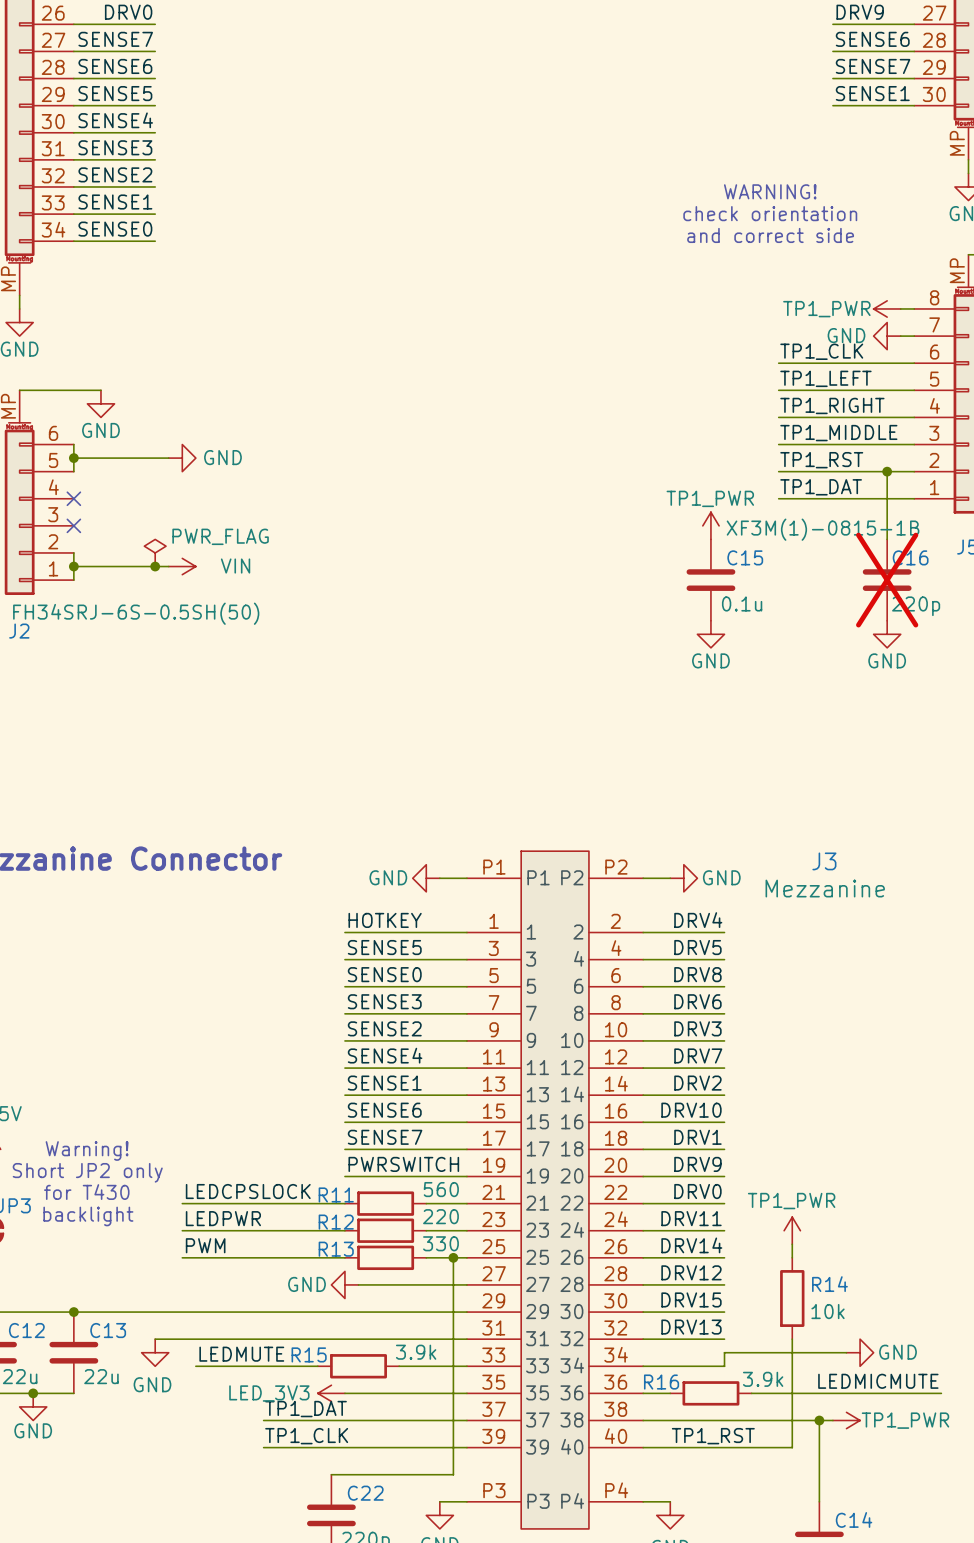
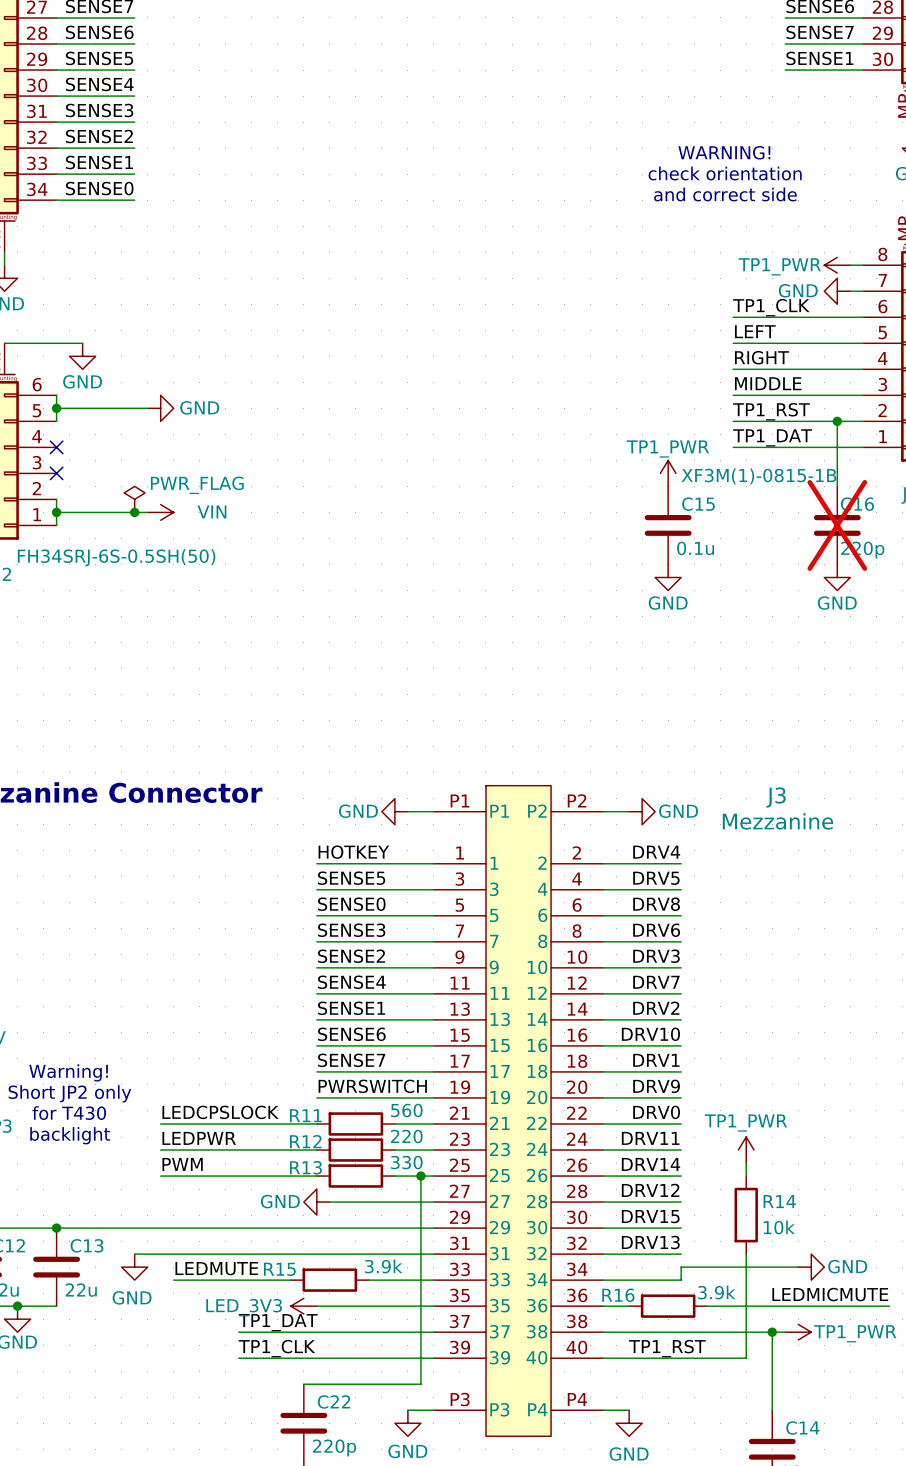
label: TP1_LEFT (825, 378) -> LEFT (755, 331)
label: TP1_RIGHT (832, 405) -> RIGHT (762, 357)
label: TP1_MIDDLE (838, 433) -> MIDDLE (768, 383)

